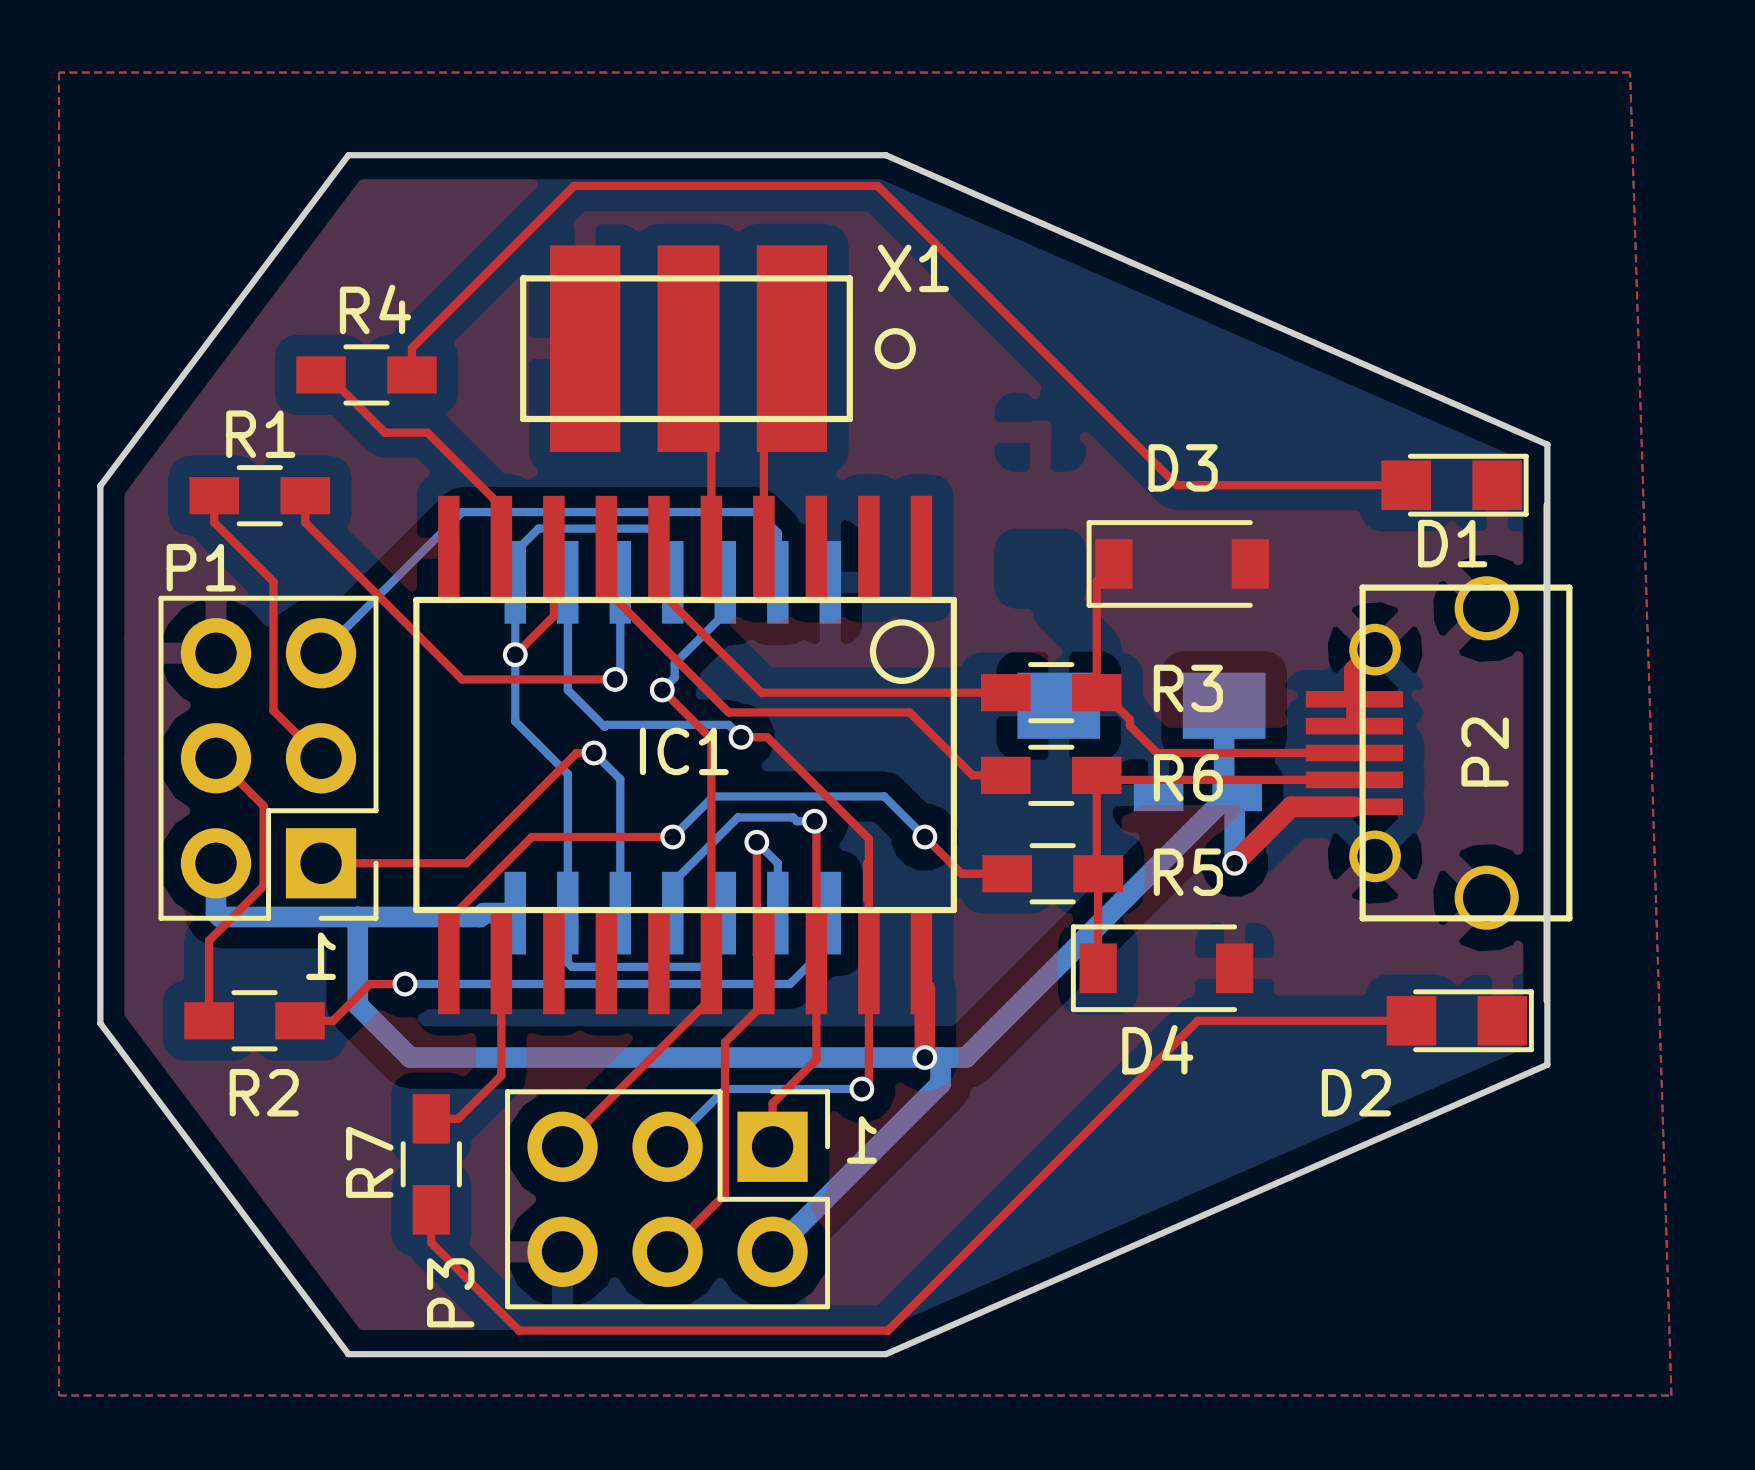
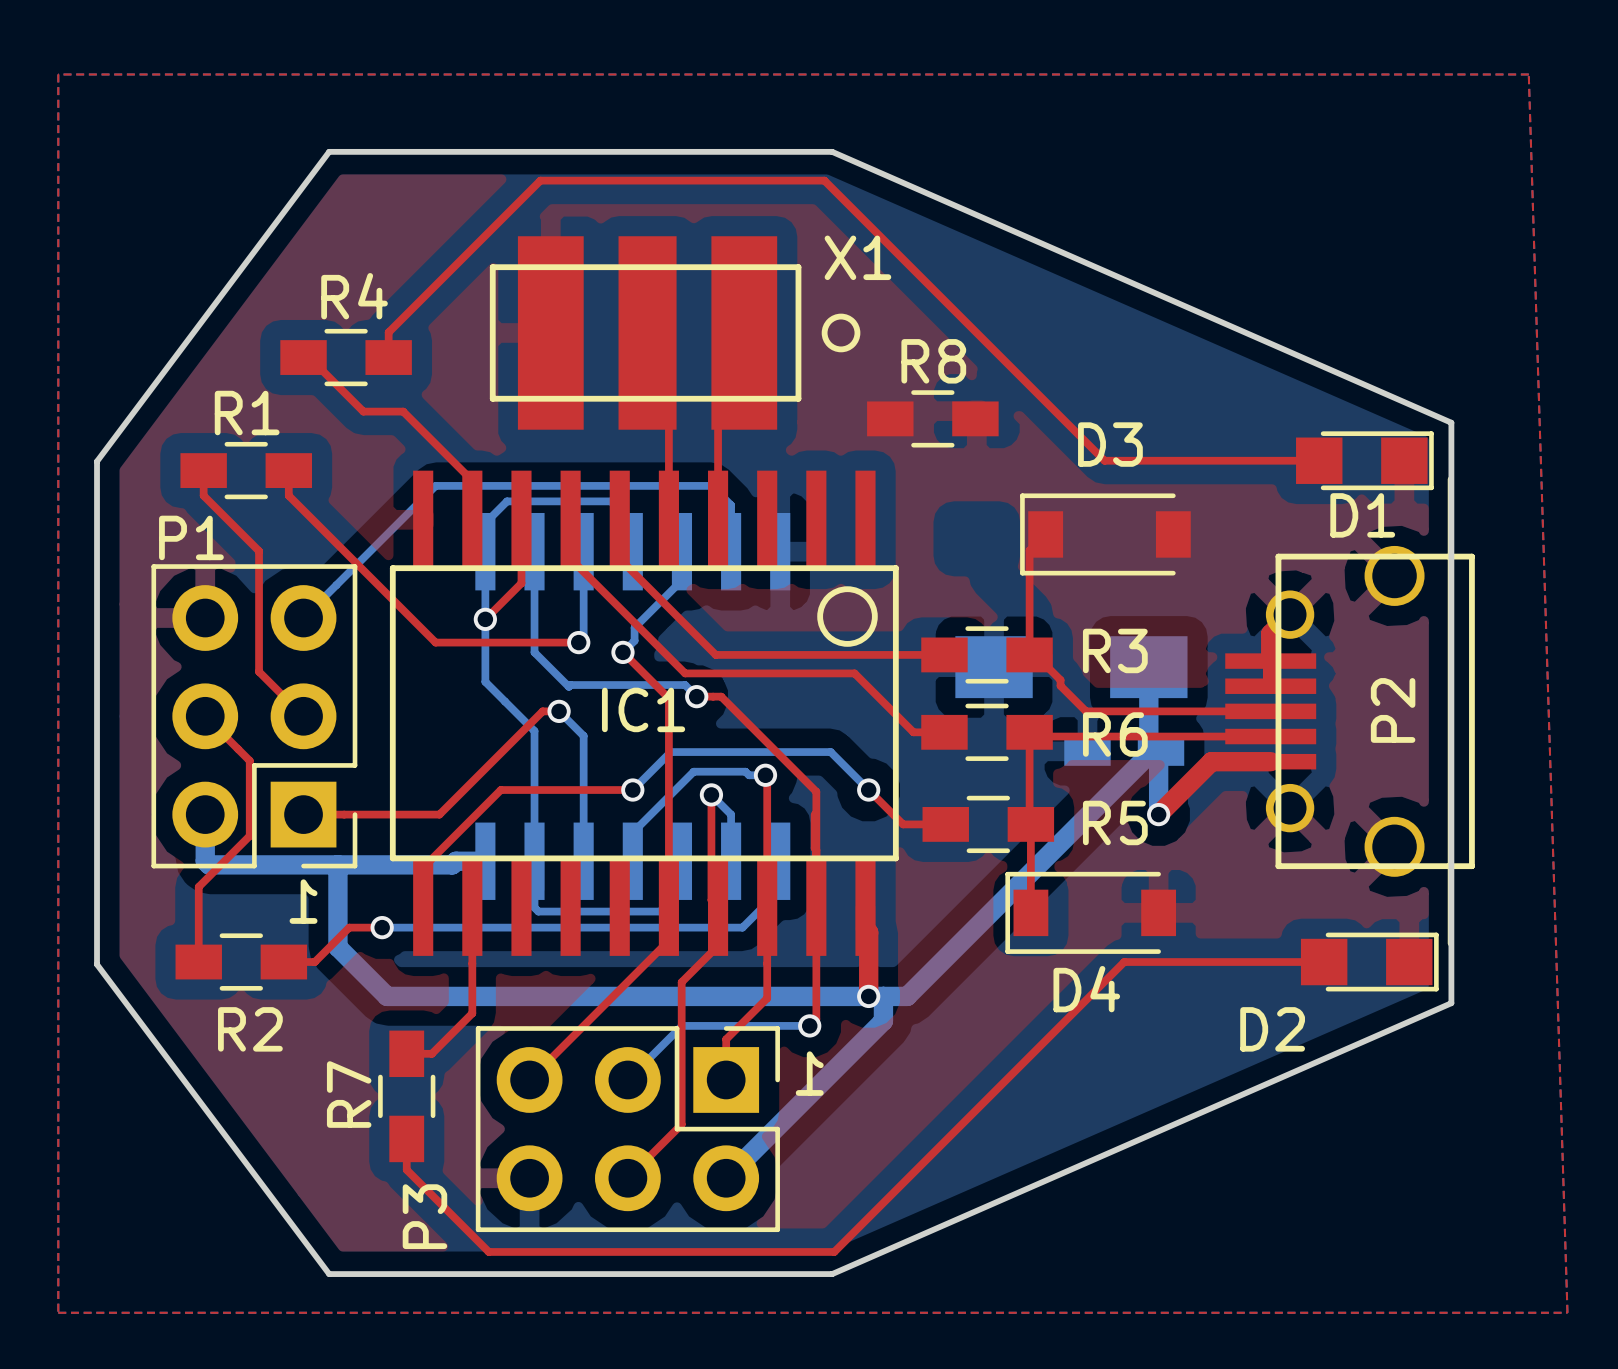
R8: none -> (932, 418)

